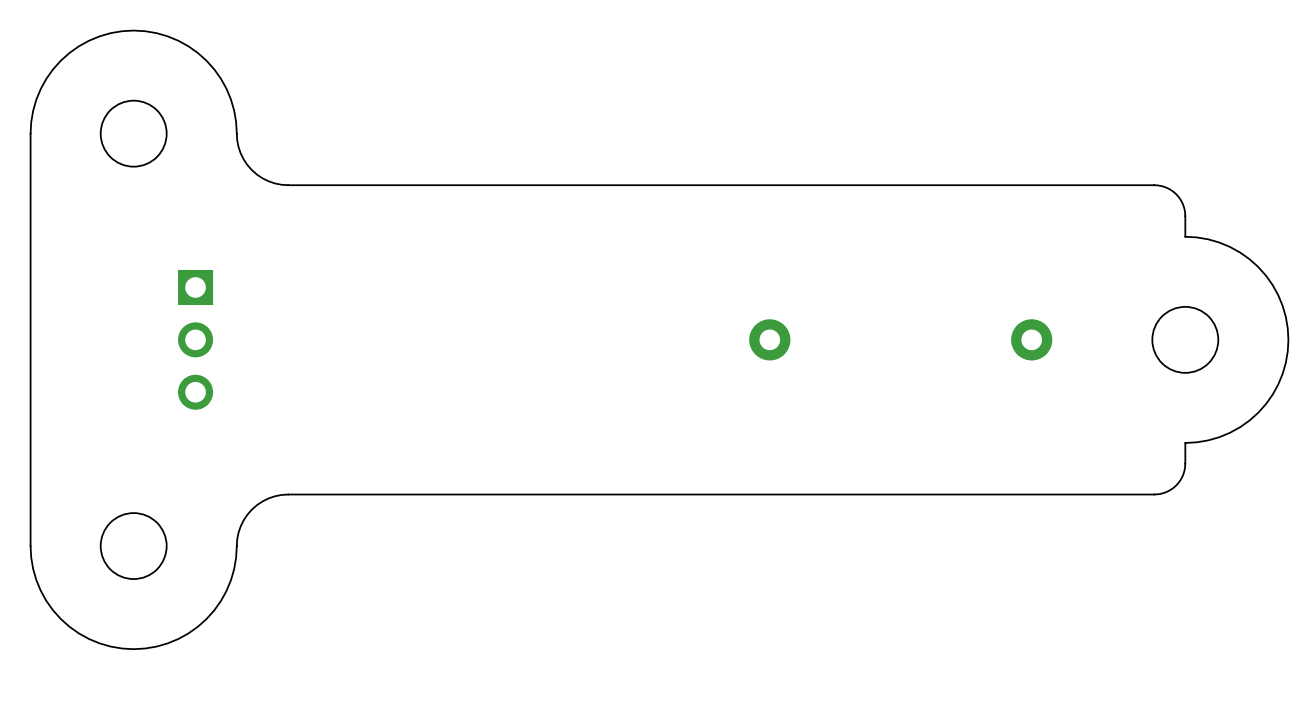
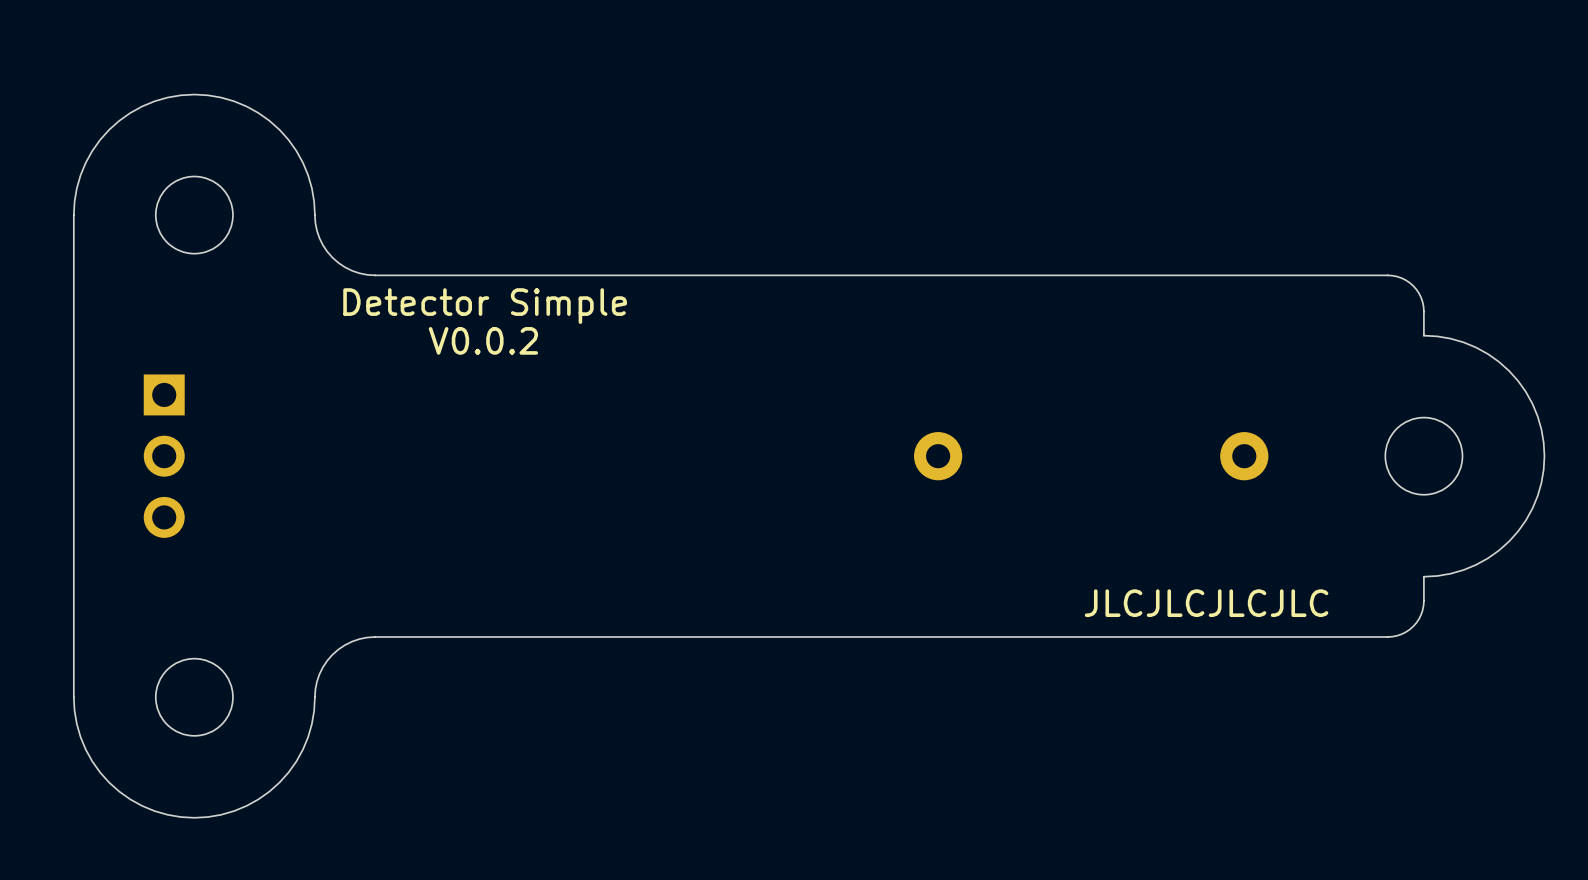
text: none -> Detector Simple (485, 306)
text: none -> V0.0.2 (483, 340)
part position: (195, 339) -> (164, 456)
text: none -> JLCJLCJLCJLC (1206, 603)

